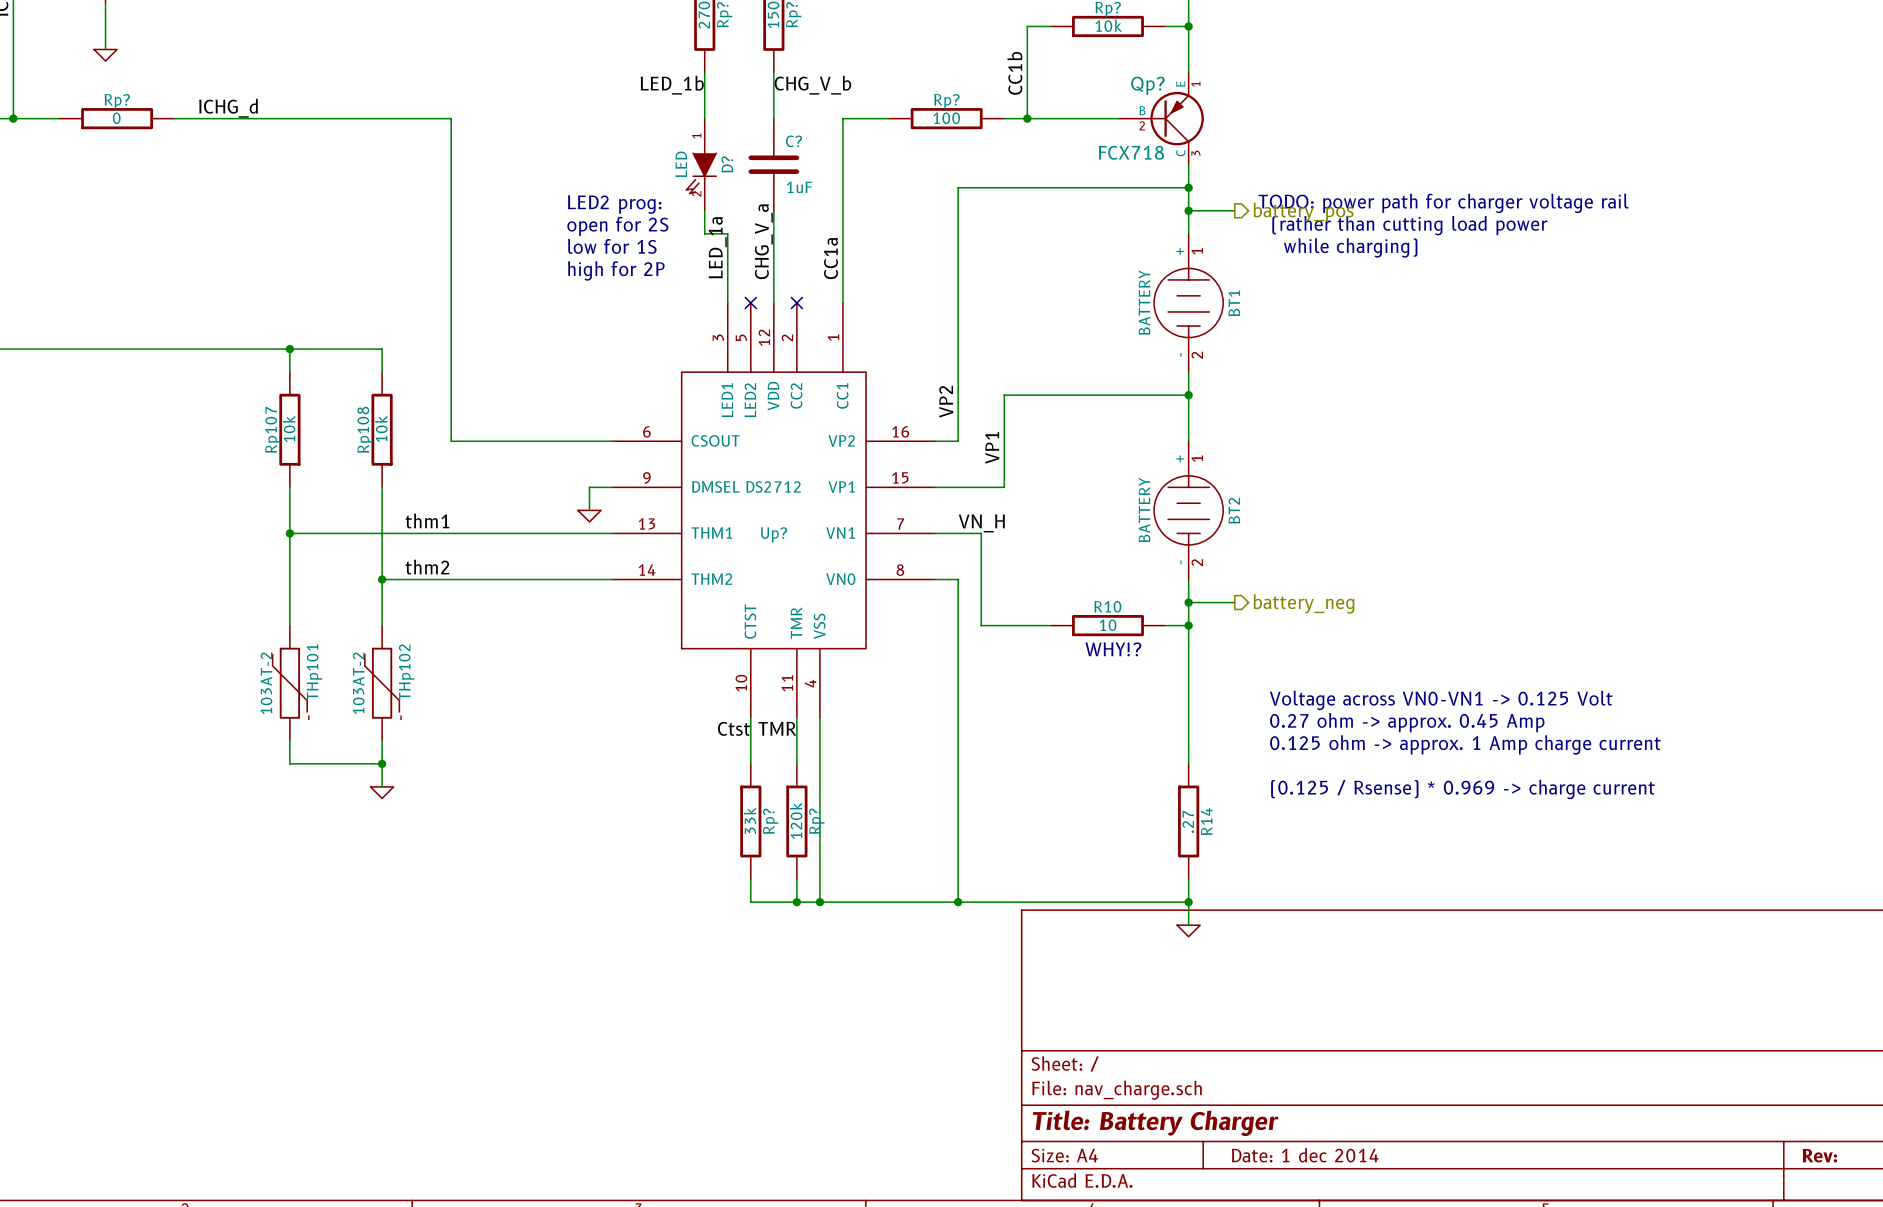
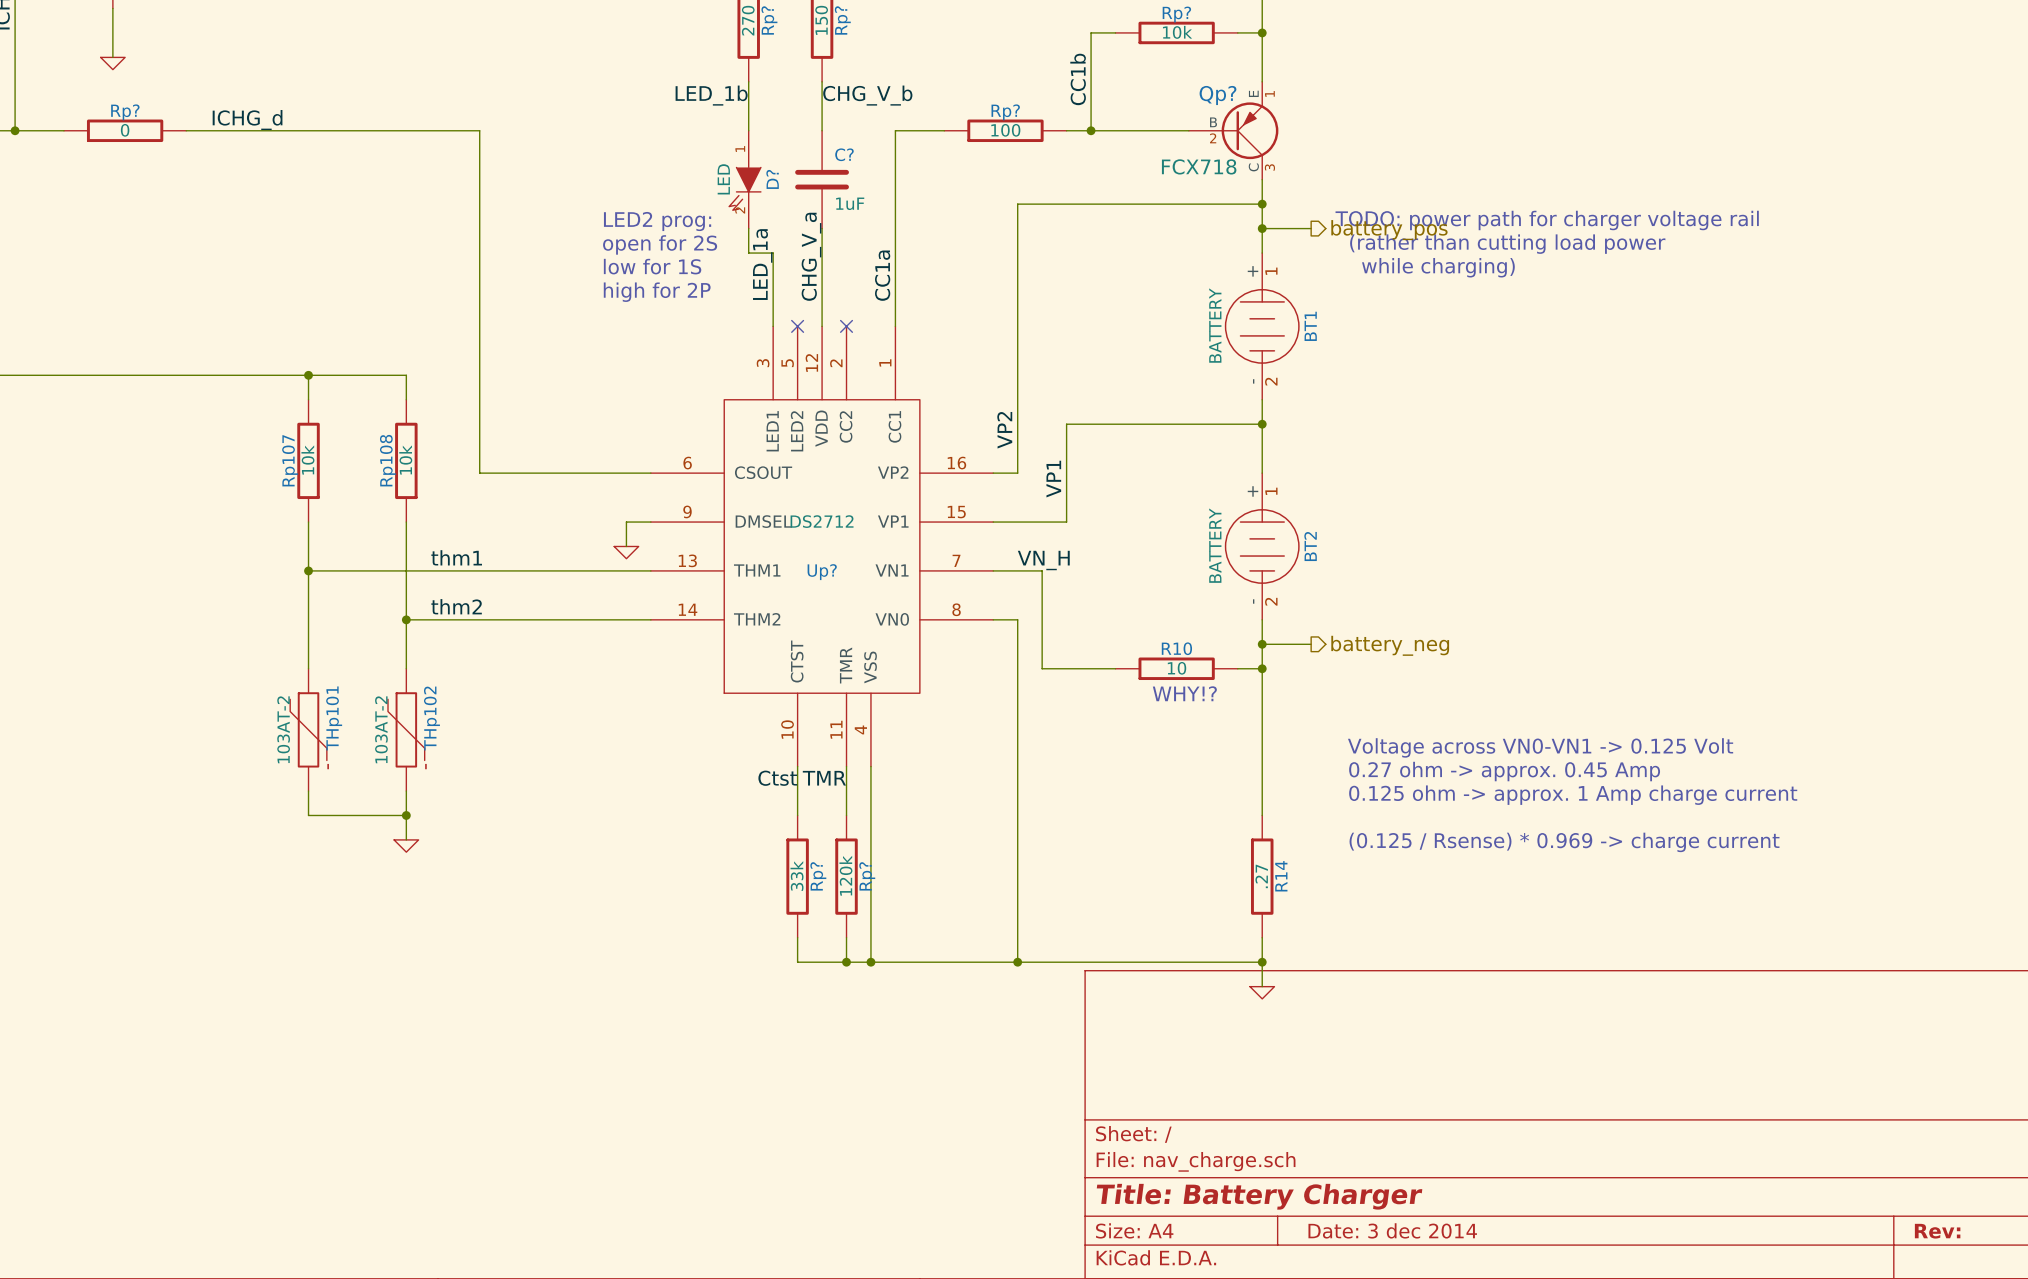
title block: Date: 1 dec 2014 (1305, 1155) -> Date: 3 dec 2014 (1392, 1230)

